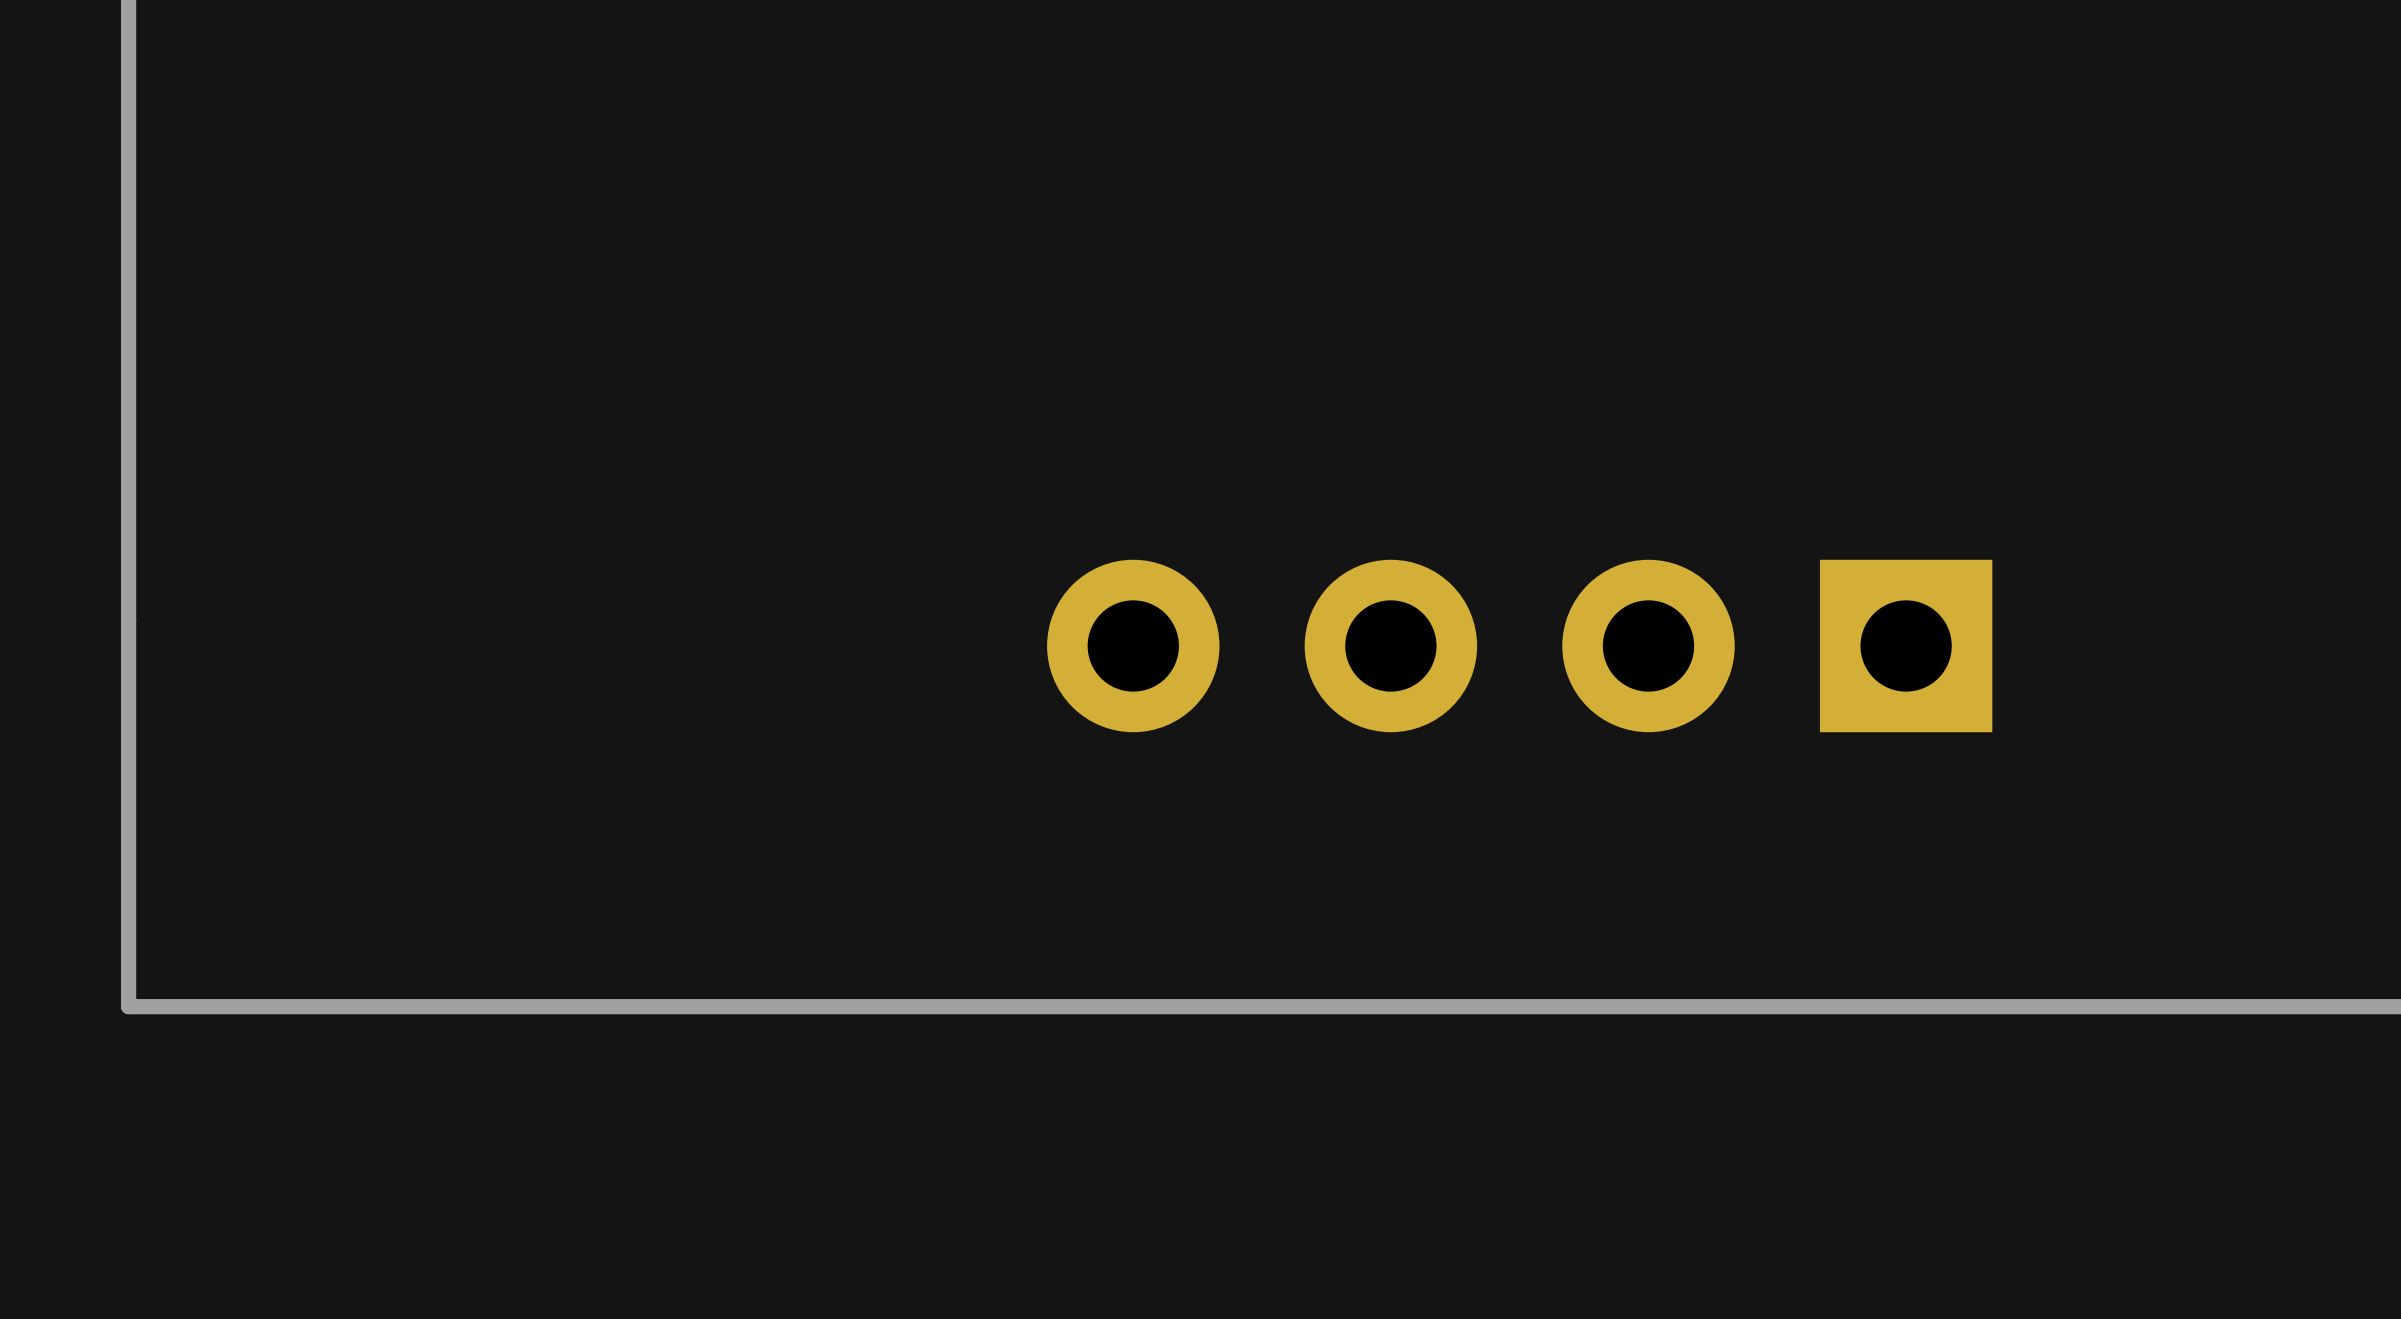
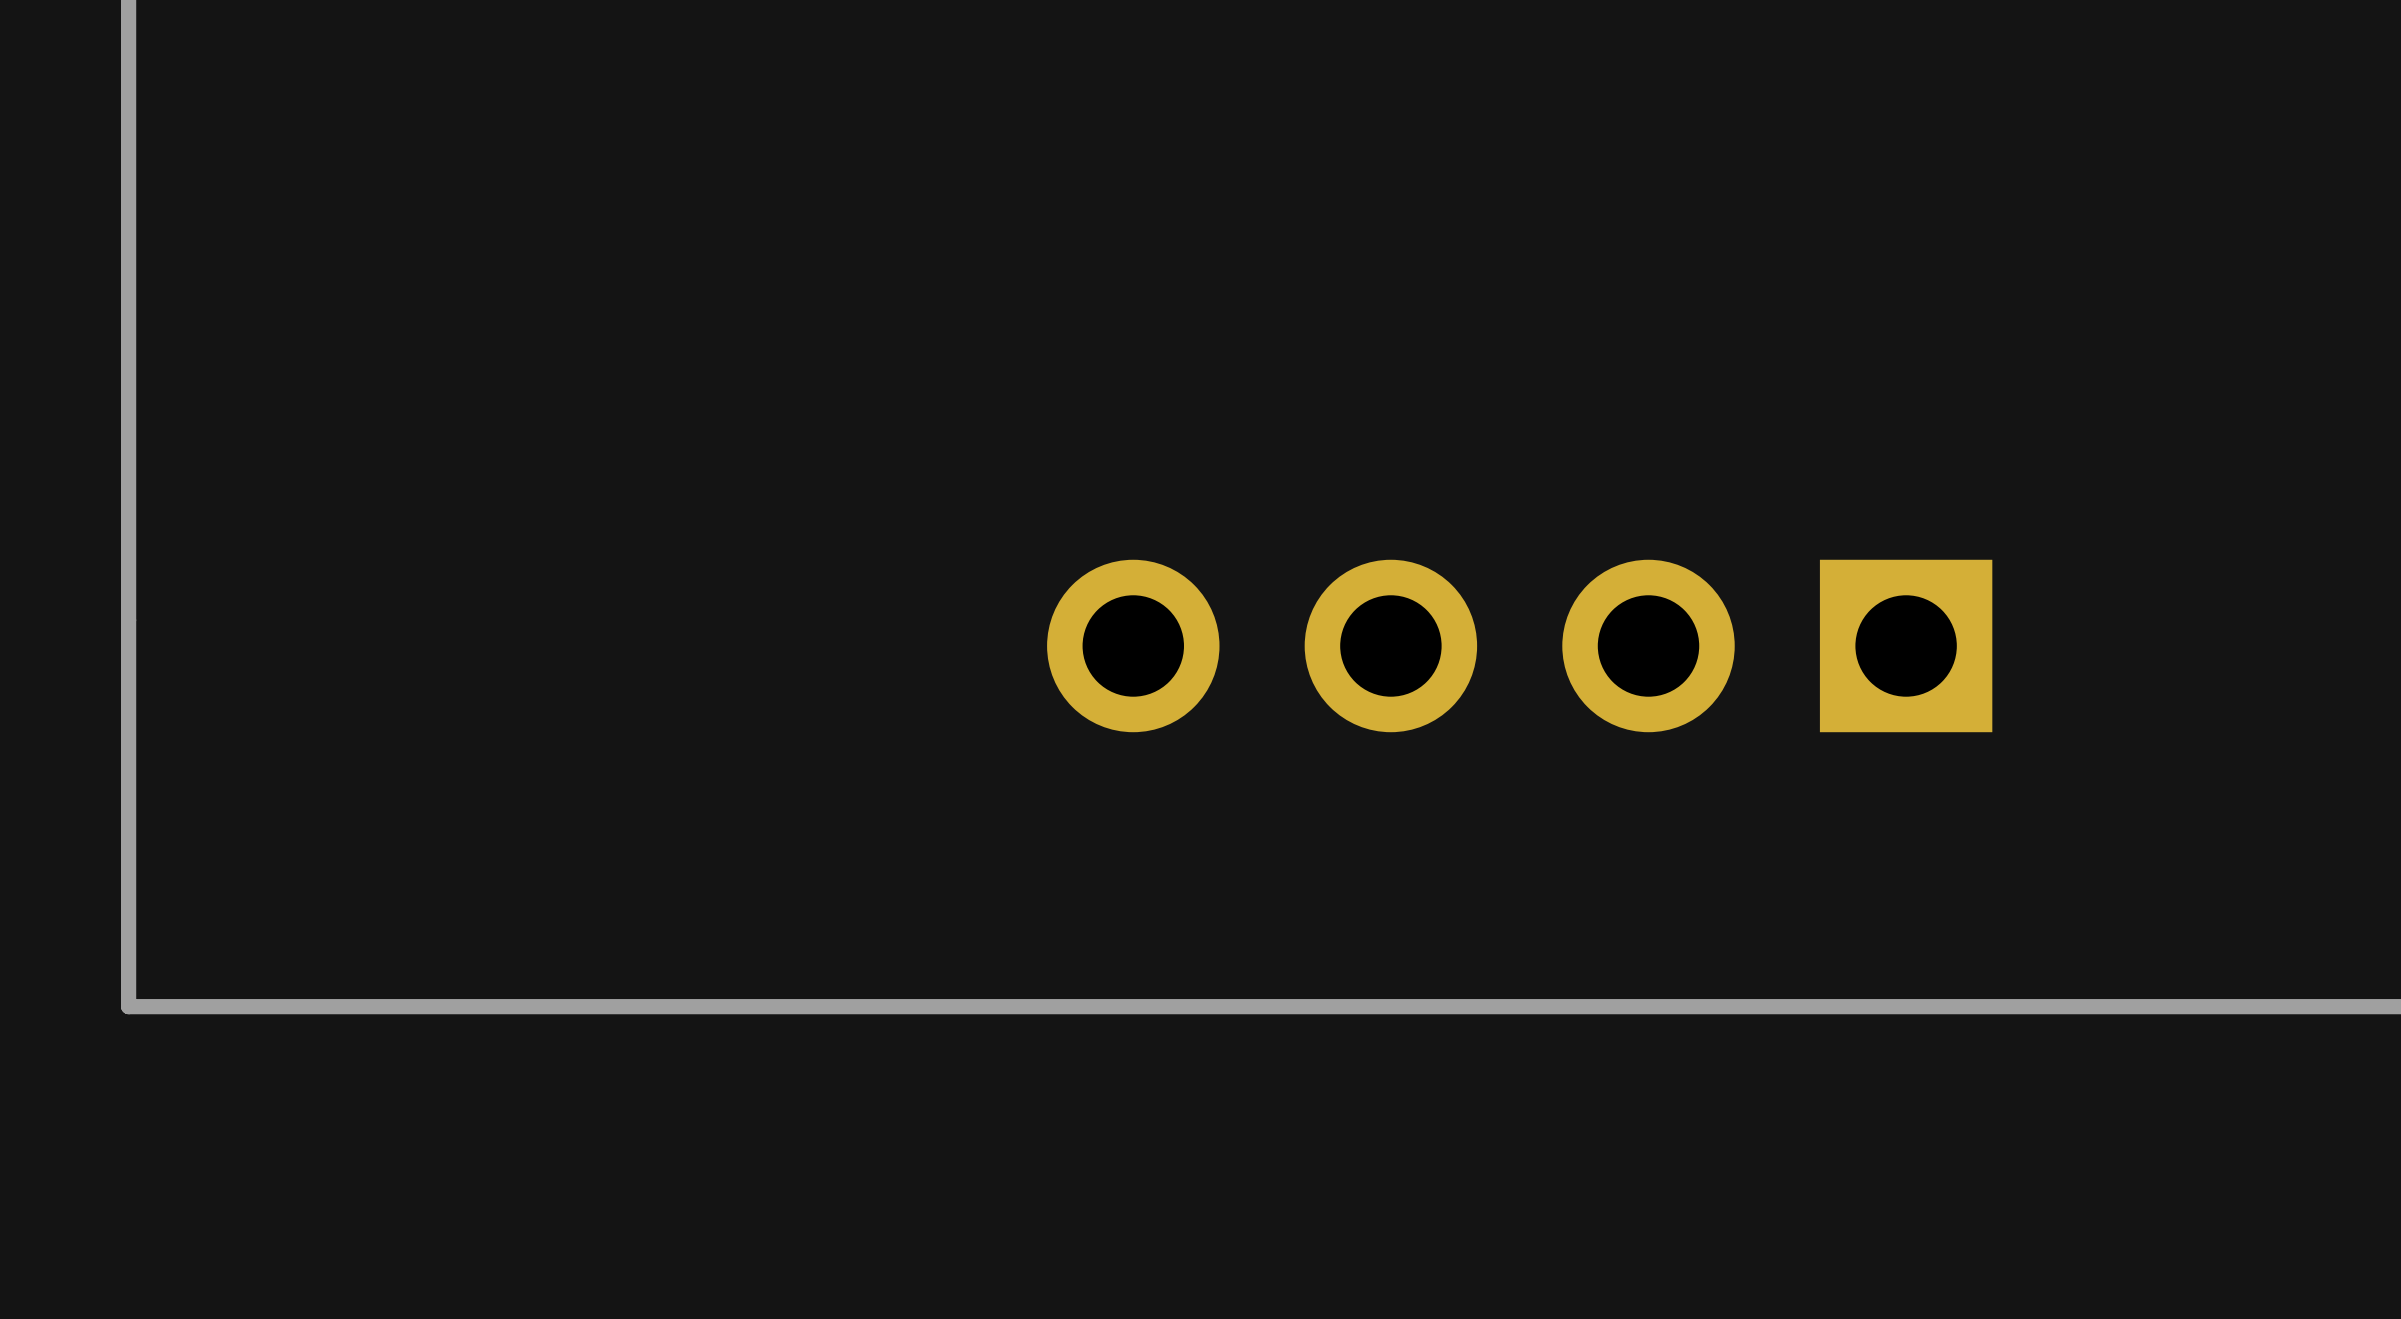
part footprint: [1047, 559, 1993, 733] -> [1047, 559, 1993, 733]

